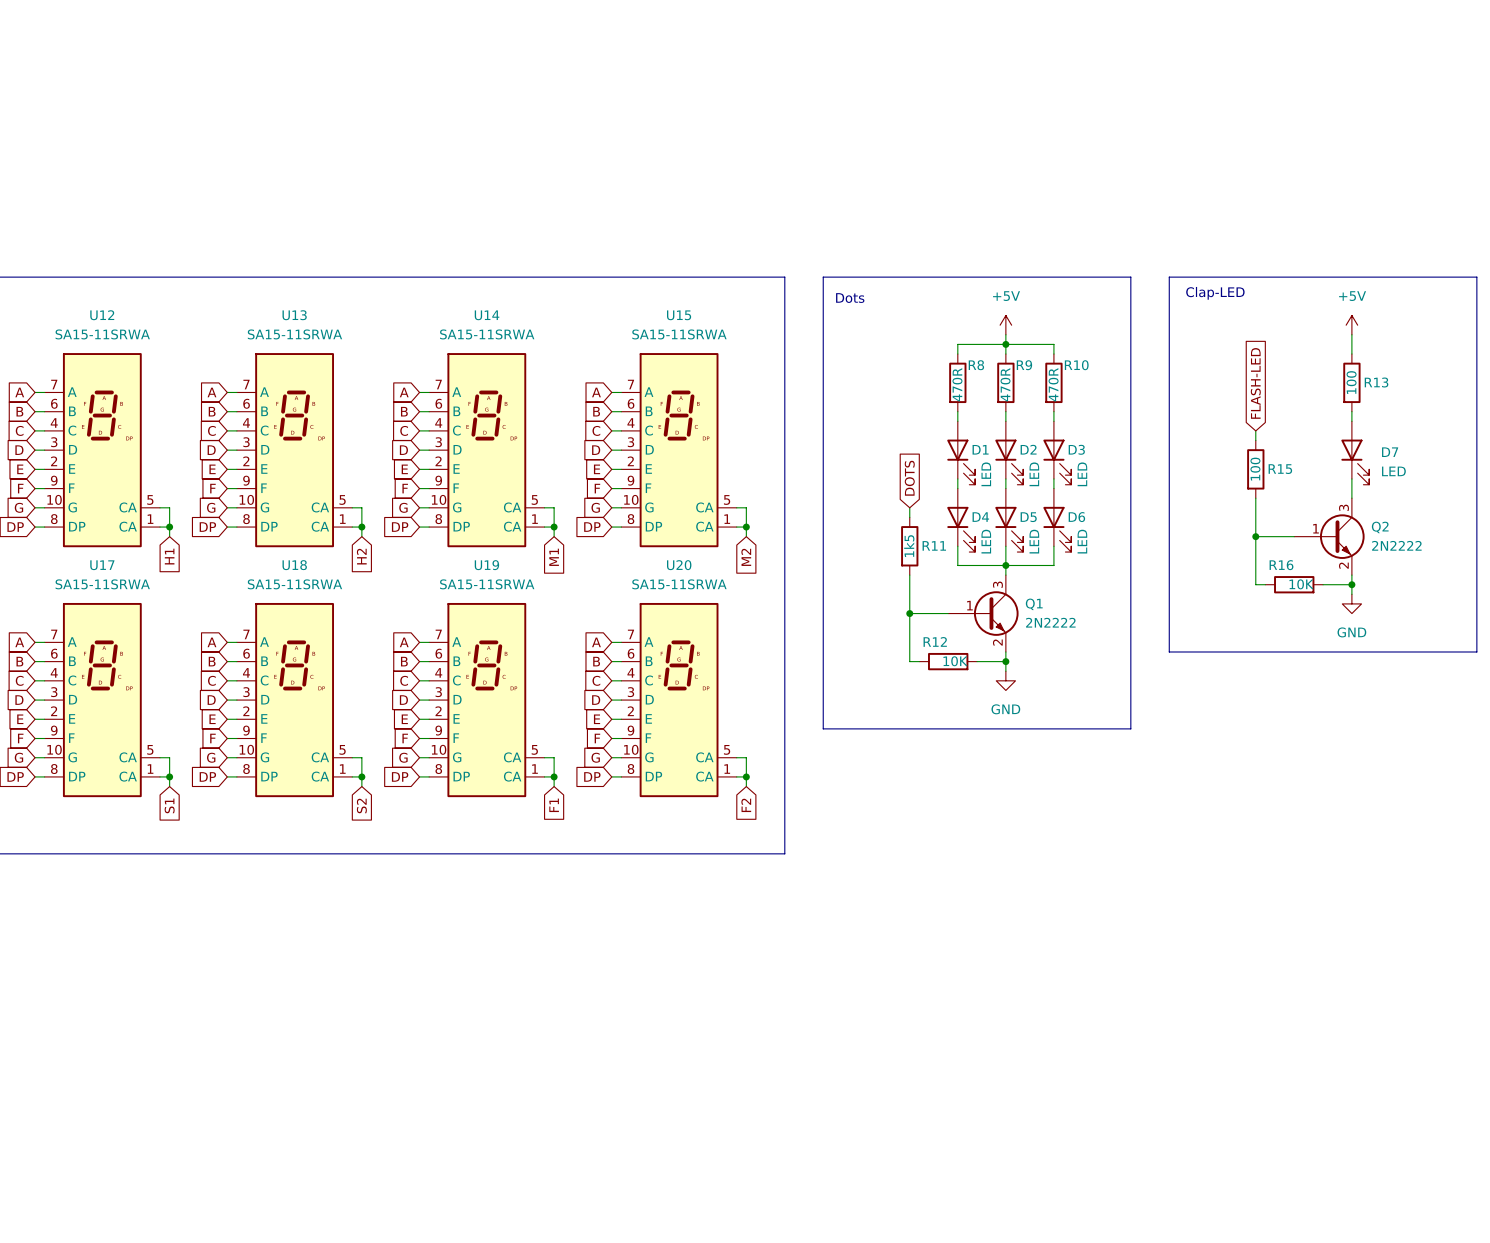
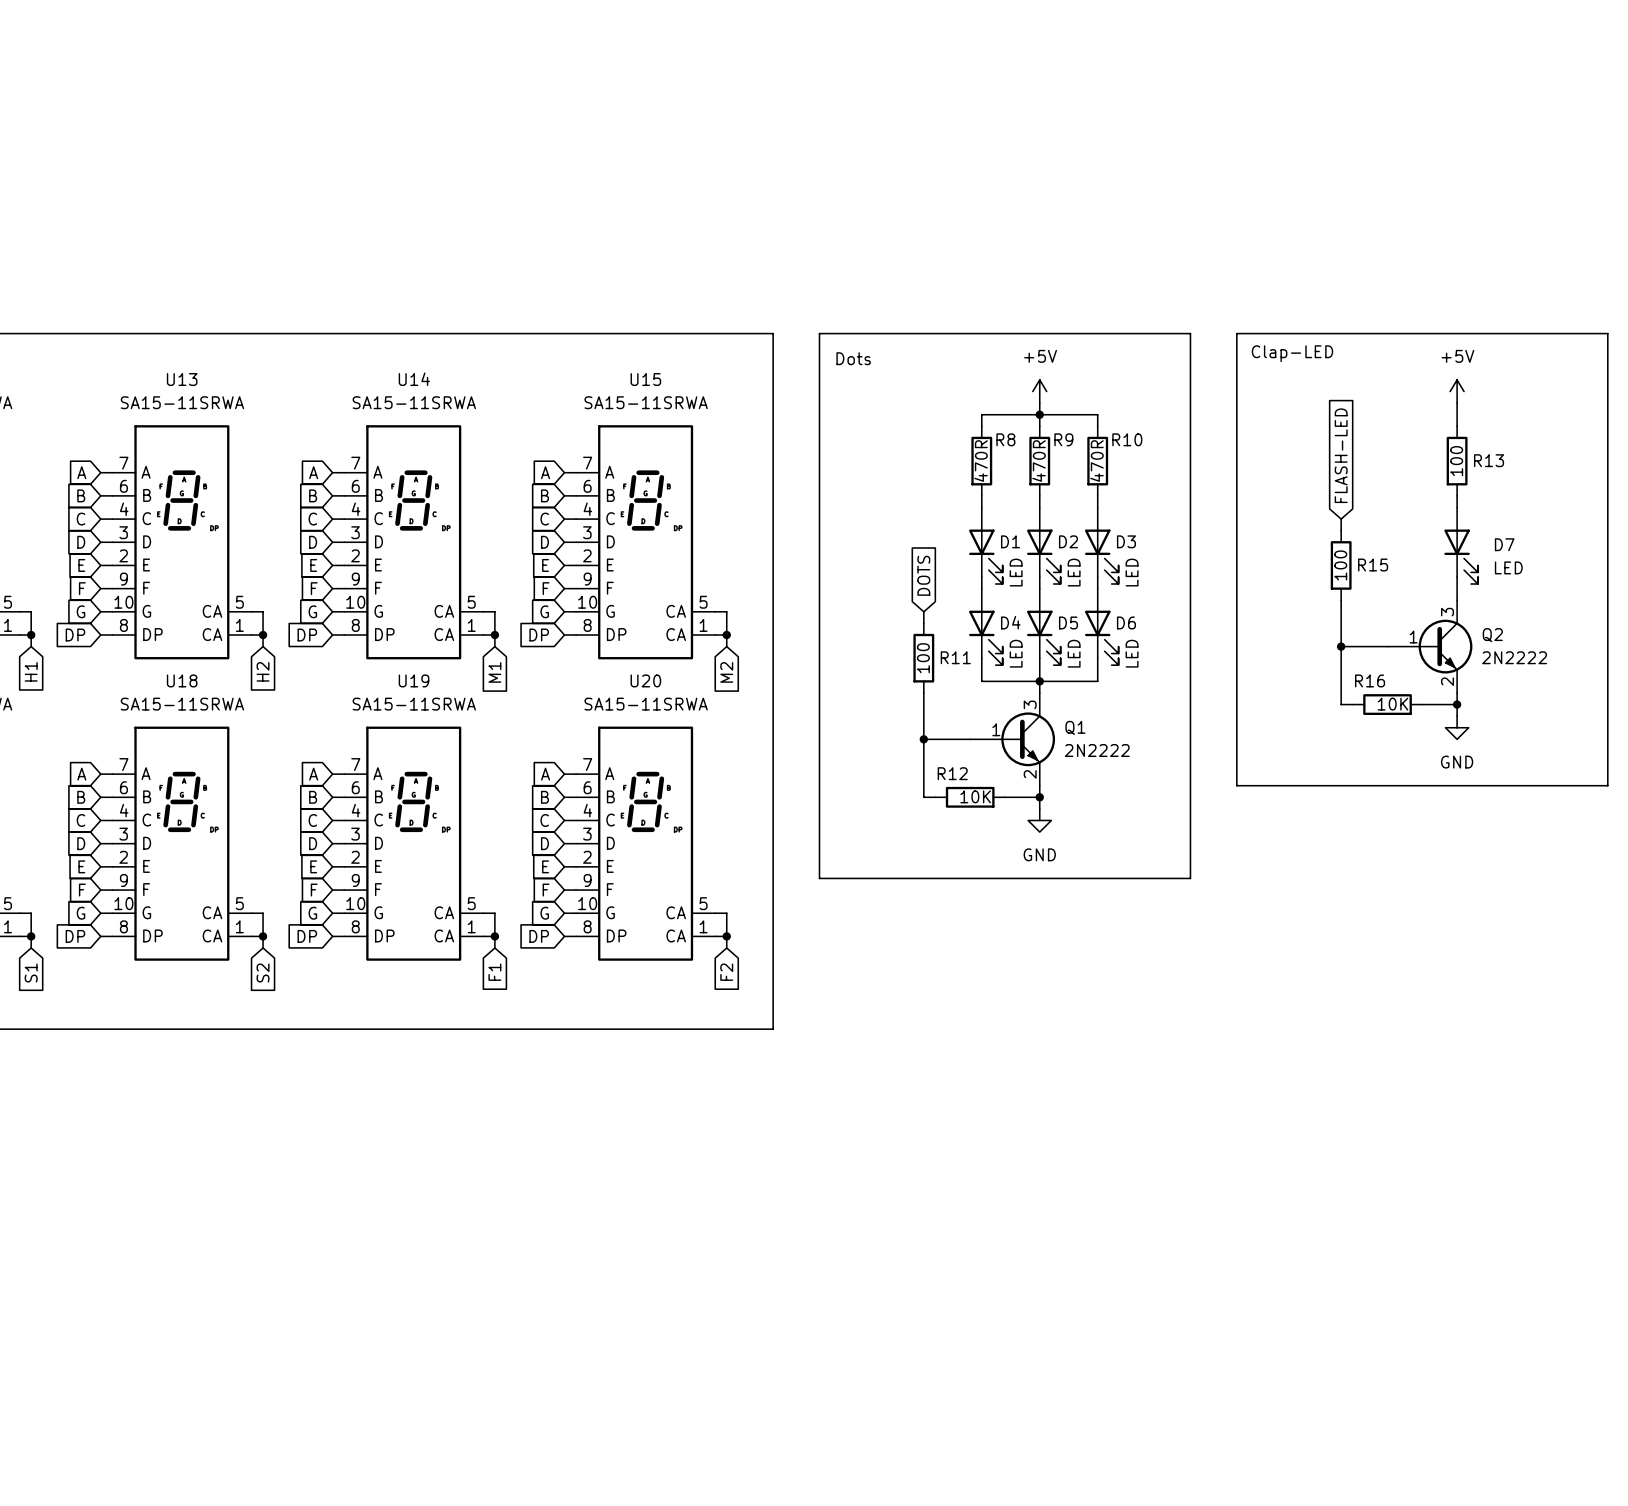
R11 value: 1k5 (909, 546) -> 100 (923, 658)

